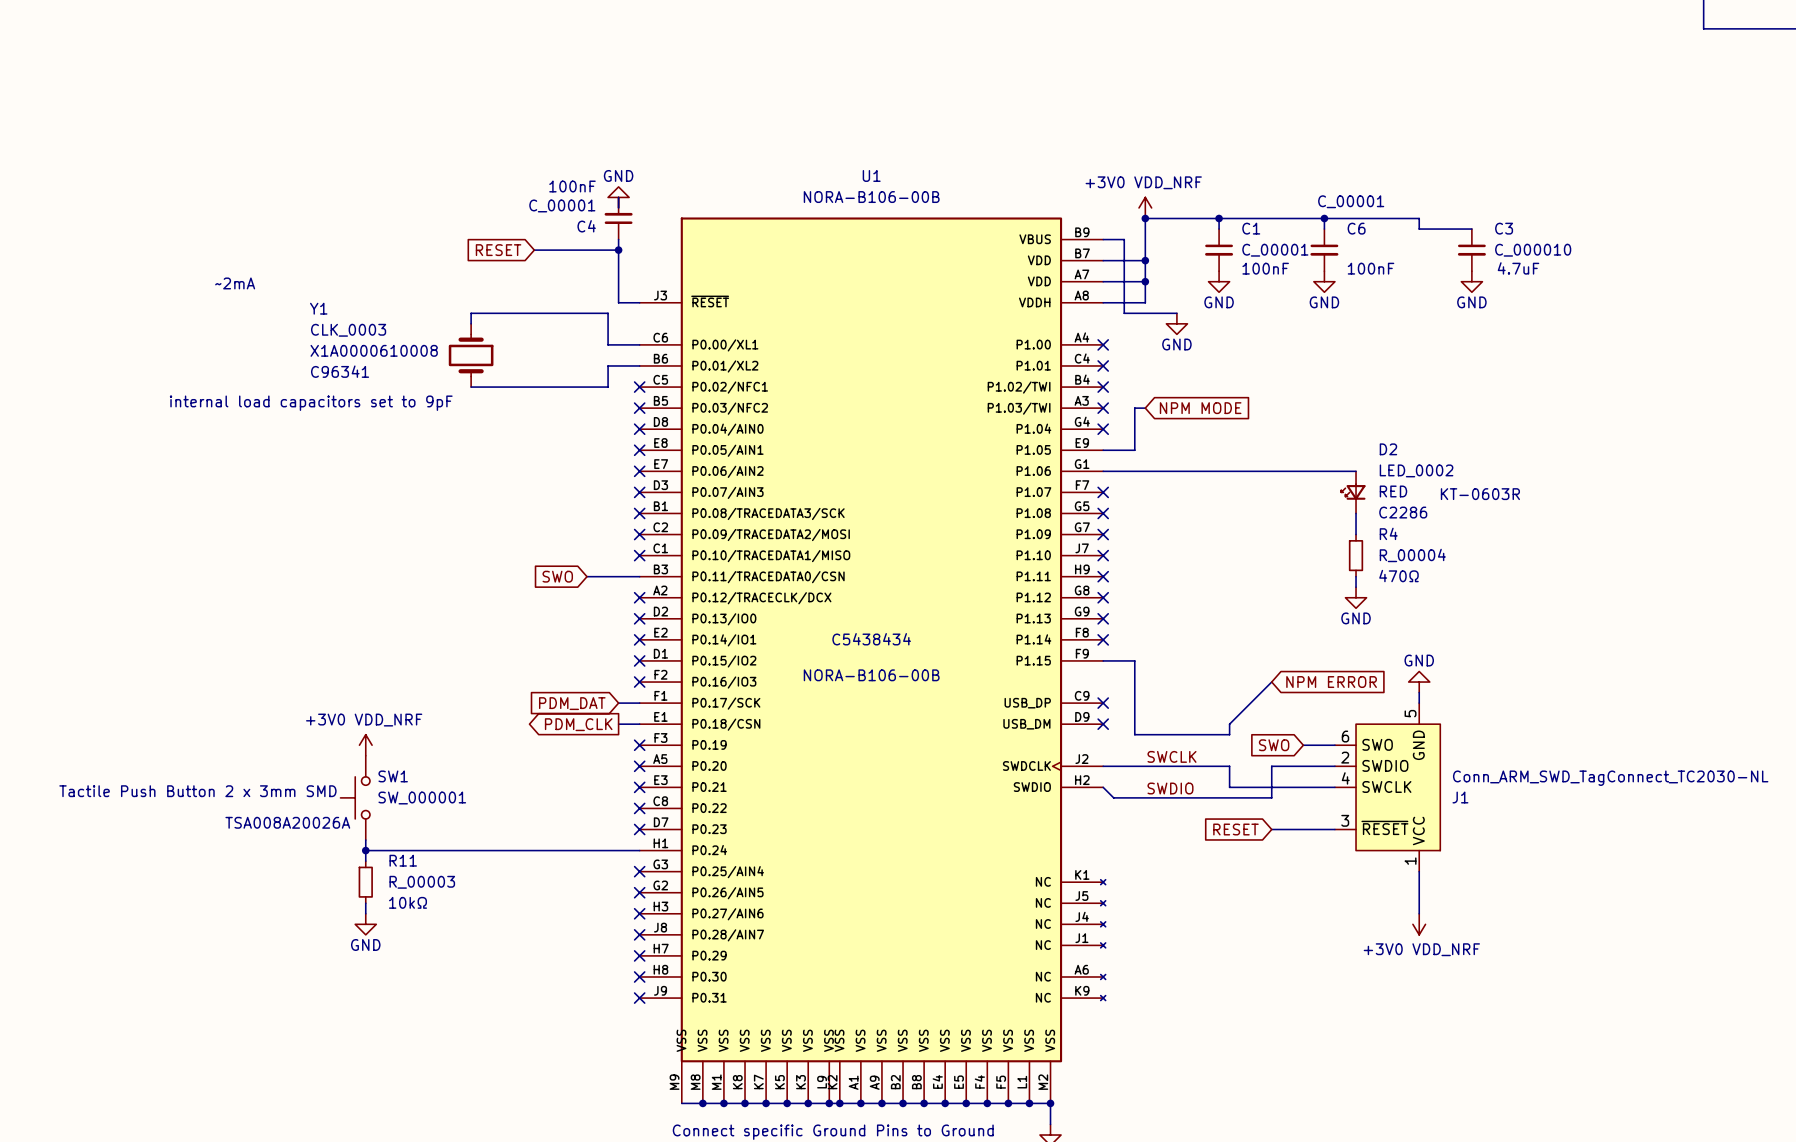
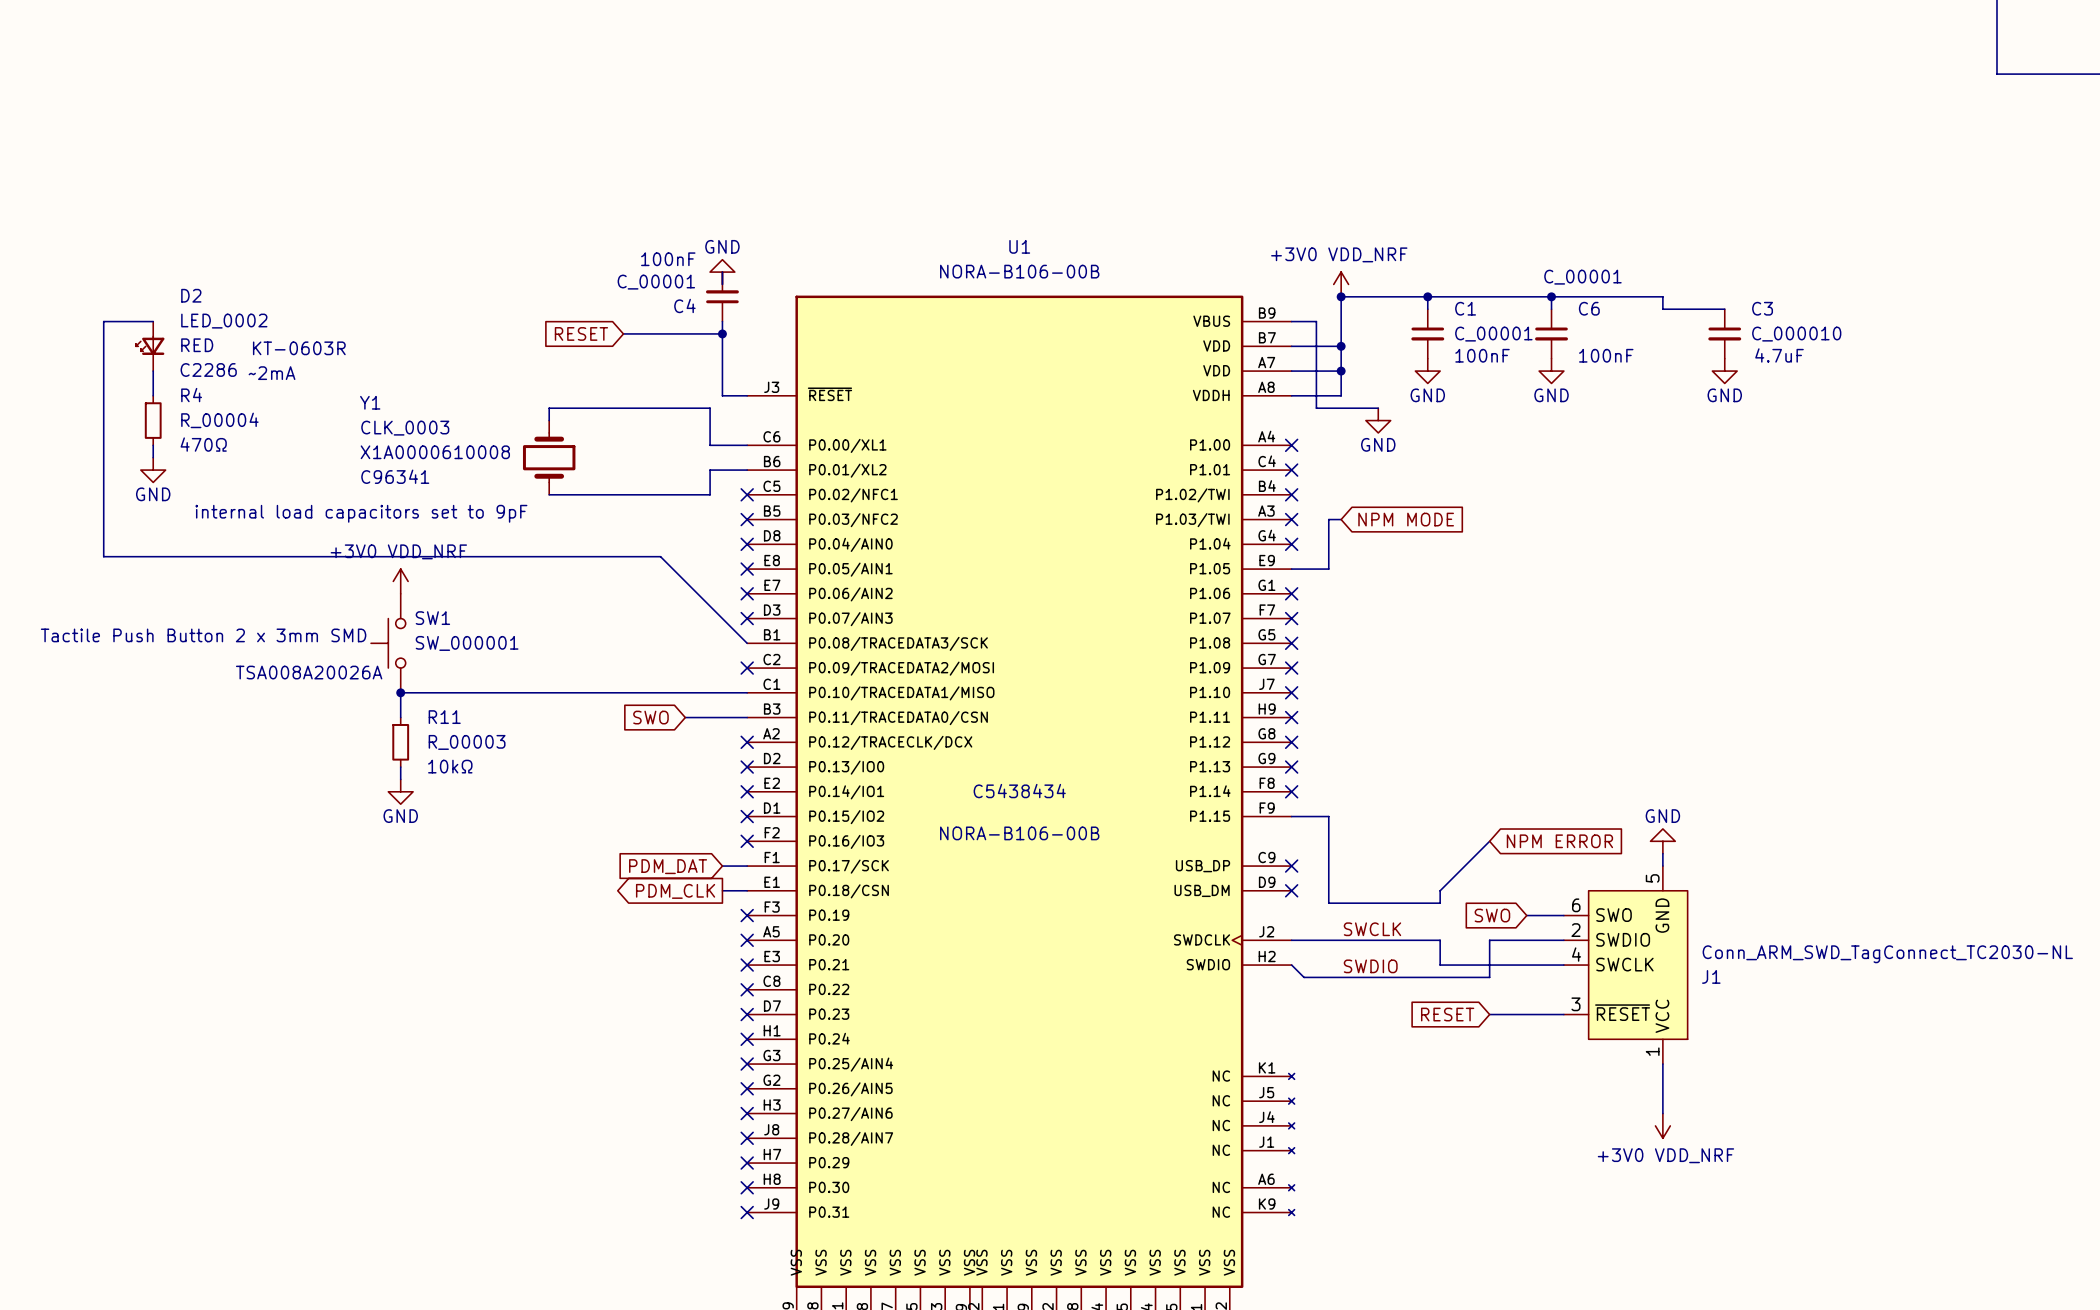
wire: none -> (153, 321) (103, 321) (103, 556) (660, 556) (747, 643)
wire: none -> (153, 371) (153, 395)
wire: none -> (153, 445) (153, 457)
power symbol: none -> GND (153, 470)
power symbol: none -> +3V0 VDD_NRF (400, 581)
wire: (1103, 471) (1356, 471) -> none
no-connect mark: none -> (1291, 593)
D2 position: (1353, 492) -> (150, 346)
no-connect mark: (639, 513) -> none
wire: (1356, 513) (1356, 534) -> none
junction: none -> (400, 692)
wire: none -> (747, 692) (400, 692) (400, 717)
no-connect mark: (639, 555) -> none
R4 position: (1356, 555) -> (153, 420)
wire: (1356, 576) (1356, 587) -> none
power symbol: GND (1356, 597) -> none
wire: none -> (400, 767) (400, 779)
power symbol: none -> GND (400, 791)
power symbol: +3V0 VDD_NRF (365, 745) -> none
SW1 position: (355, 797) -> (388, 643)
wire: (365, 840) (365, 861) -> none
wire: (365, 850) (639, 850) -> none
junction: (365, 850) -> none
no-connect mark: none -> (747, 1039)
R11 position: (365, 882) -> (400, 742)
wire: (365, 903) (365, 913) -> none
power symbol: GND (365, 924) -> none

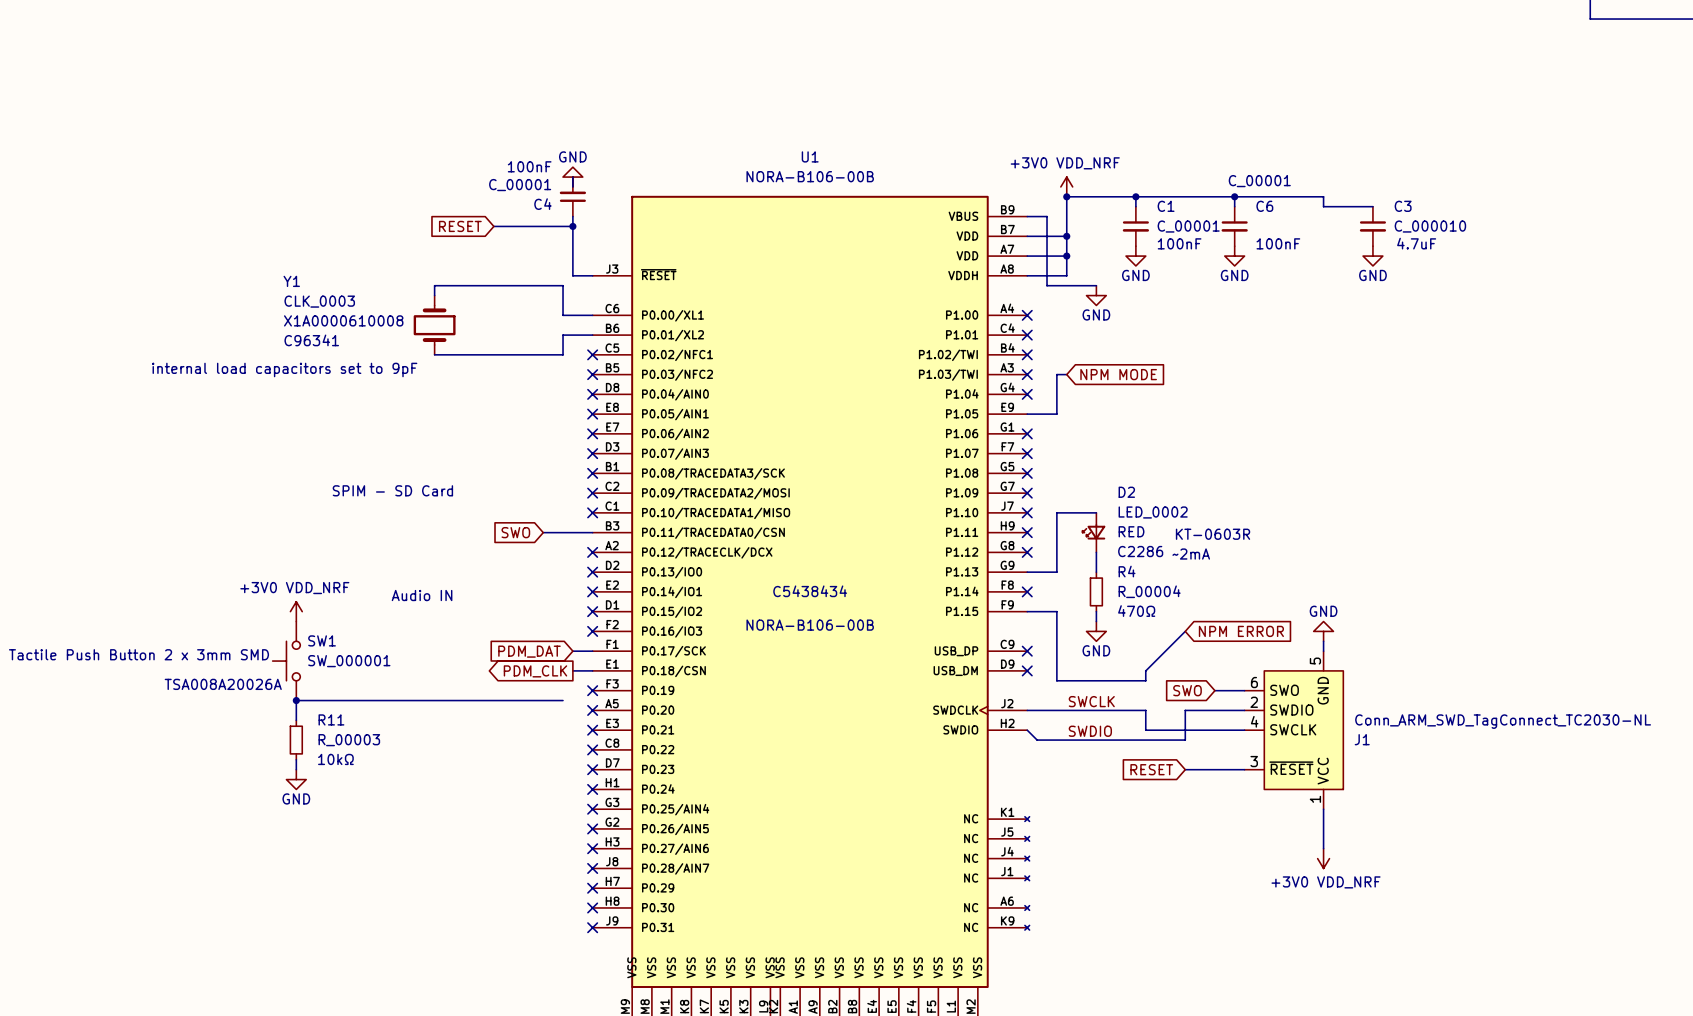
wire: (153, 321) (103, 321) (103, 556) (660, 556) (747, 643) -> none
D2 position: (150, 346) -> (1093, 532)
wire: (153, 371) (153, 395) -> none
text: ~2mA (272, 373) -> none
R4 position: (153, 420) -> (1096, 591)
wire: (153, 445) (153, 457) -> none
power symbol: GND (153, 470) -> none
power symbol position: +3V0 VDD_NRF (400, 581) -> +3V0 VDD_NRF (296, 611)
SW1 position: (388, 643) -> (286, 661)
no-connect mark: none -> (592, 473)
text: none -> SPIM - SD Card (392, 490)
junction: (400, 692) -> none
wire: (747, 692) (400, 692) (400, 717) -> none
no-connect mark: none -> (592, 512)
wire: none -> (1096, 512) (1056, 512) (1056, 572) (1027, 572)
R11 position: (400, 742) -> (296, 740)
wire: none -> (1096, 552) (1096, 572)
text: none -> ~2mA (1191, 554)
wire: (400, 767) (400, 779) -> (296, 759) (296, 769)
no-connect mark: (1291, 767) -> none
power symbol position: GND (400, 791) -> GND (296, 779)
text: none -> Audio IN (422, 595)
wire: none -> (1096, 611) (1096, 621)
power symbol: none -> GND (1096, 631)
junction: none -> (296, 700)
wire: none -> (563, 700) (296, 700) (296, 720)

